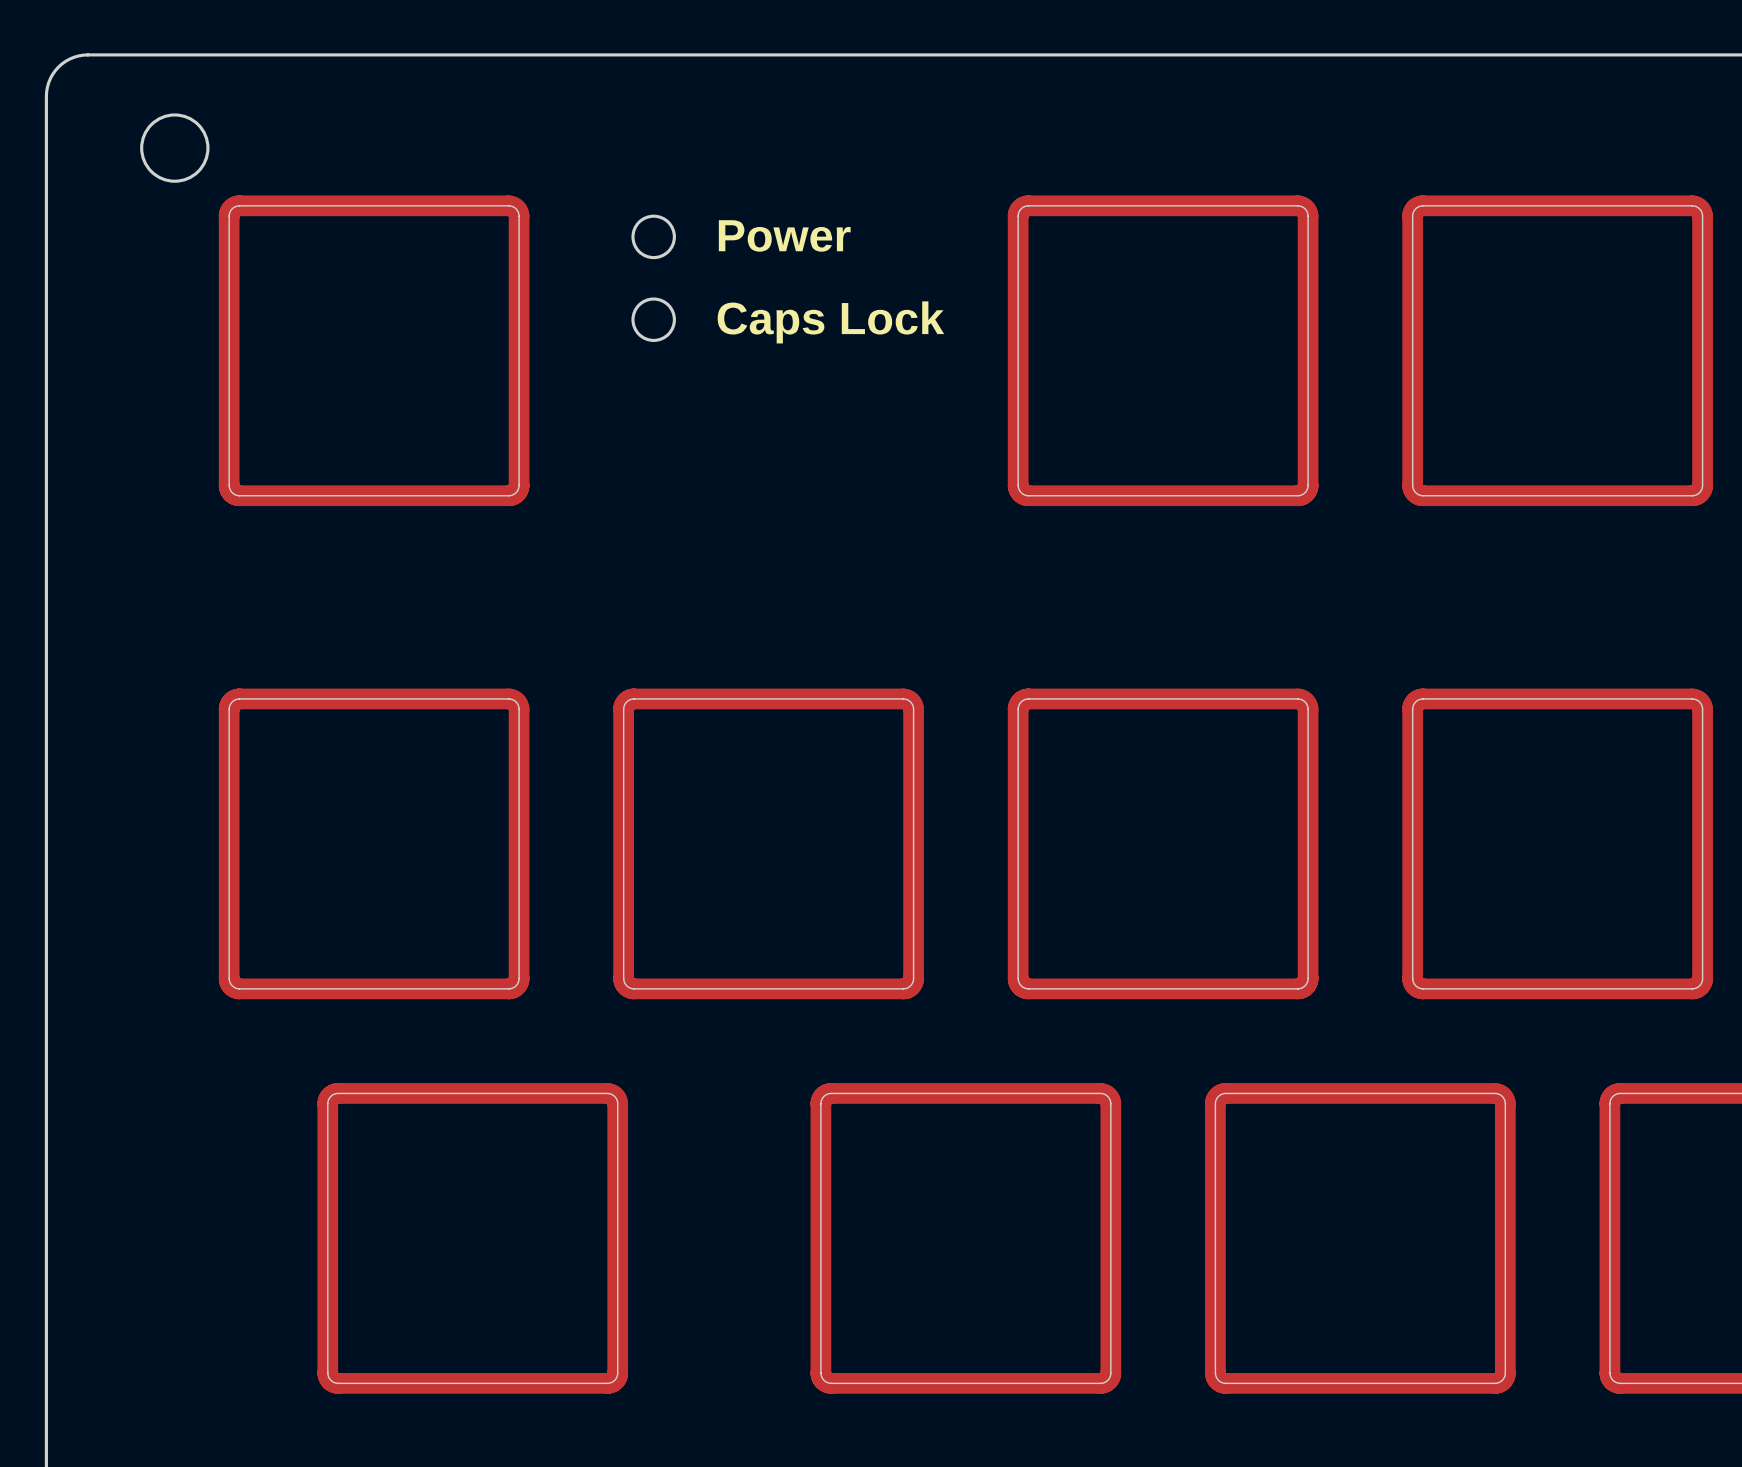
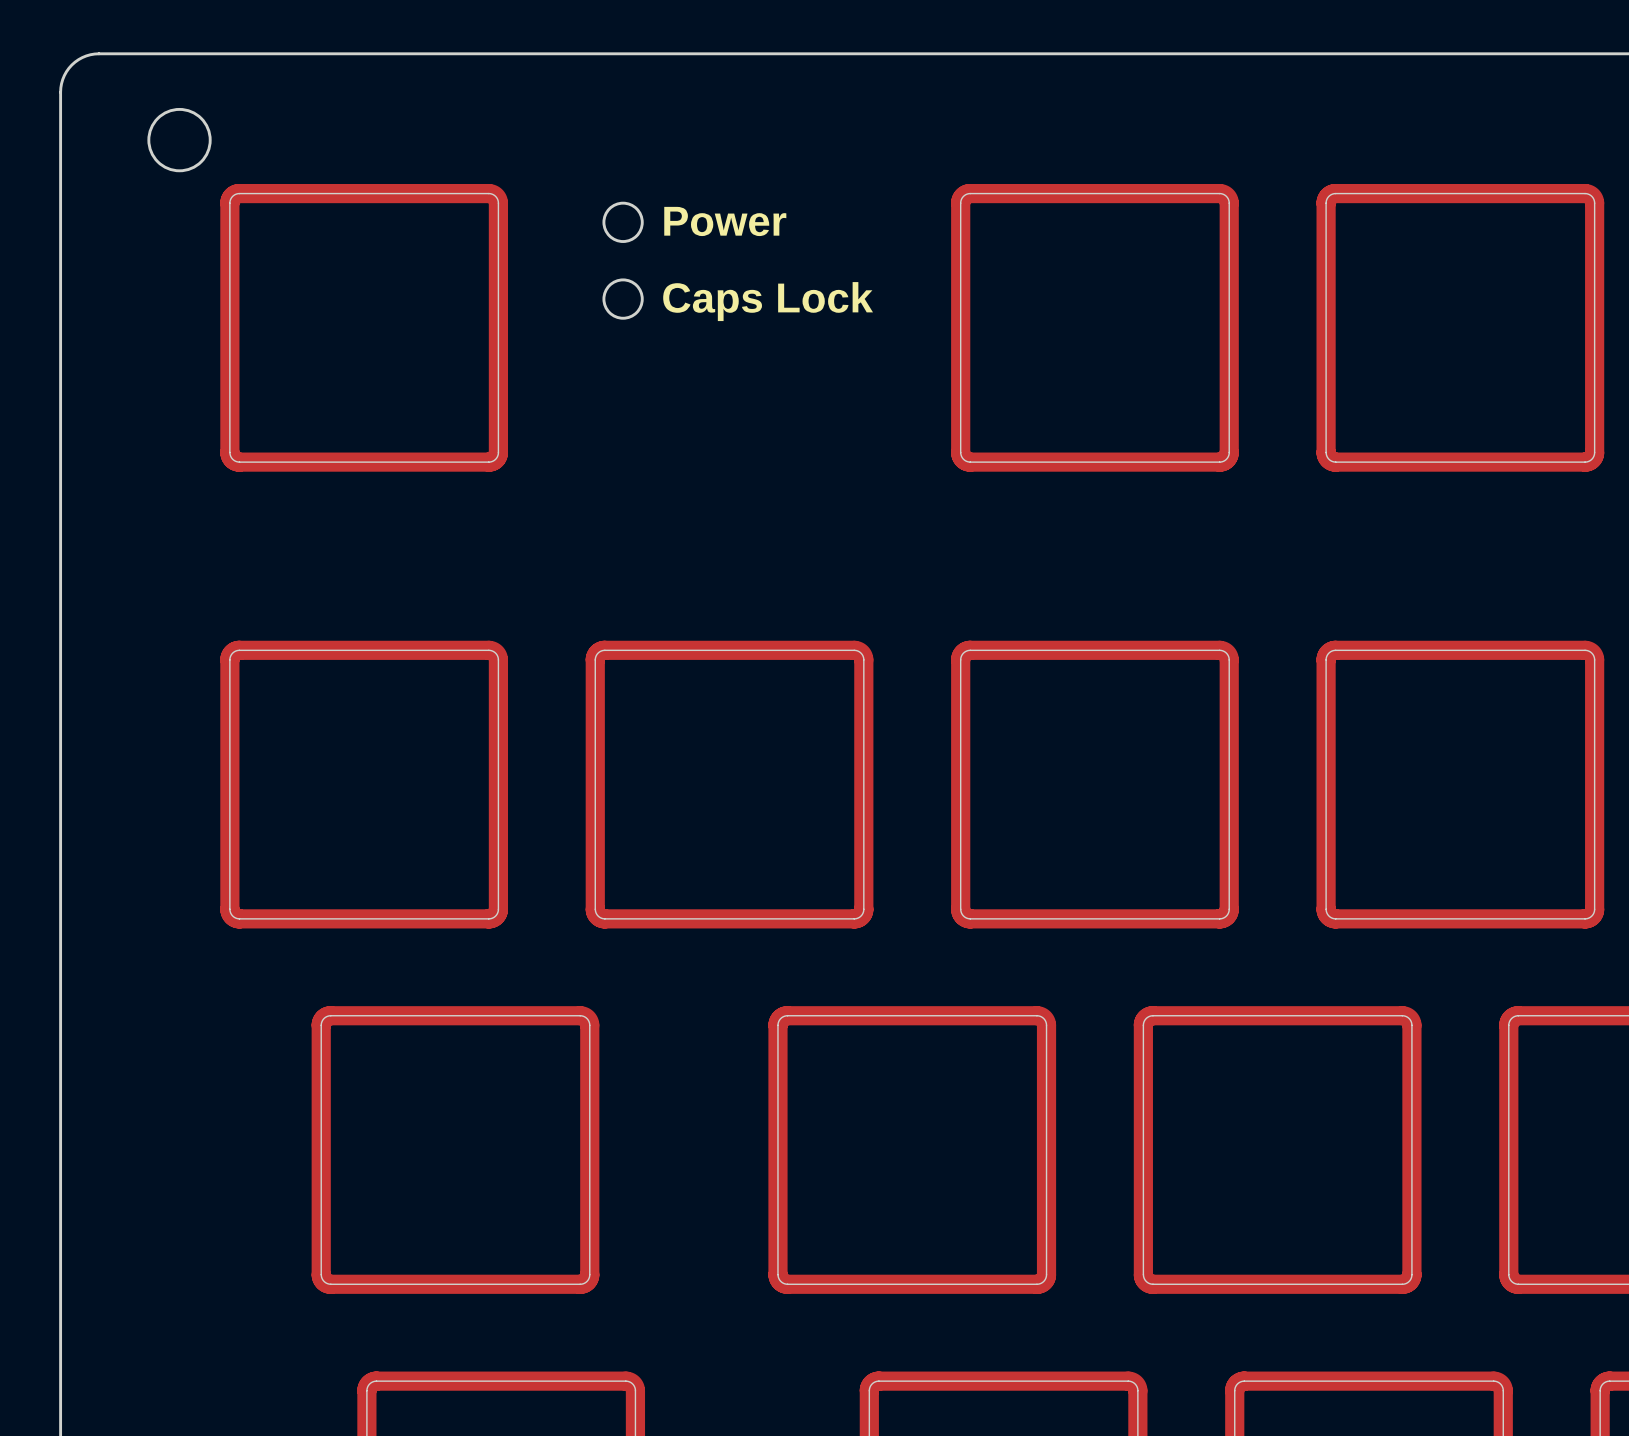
text position: Power (784, 235) -> Power (725, 221)
text position: Caps Lock (830, 322) -> Caps Lock (768, 301)

